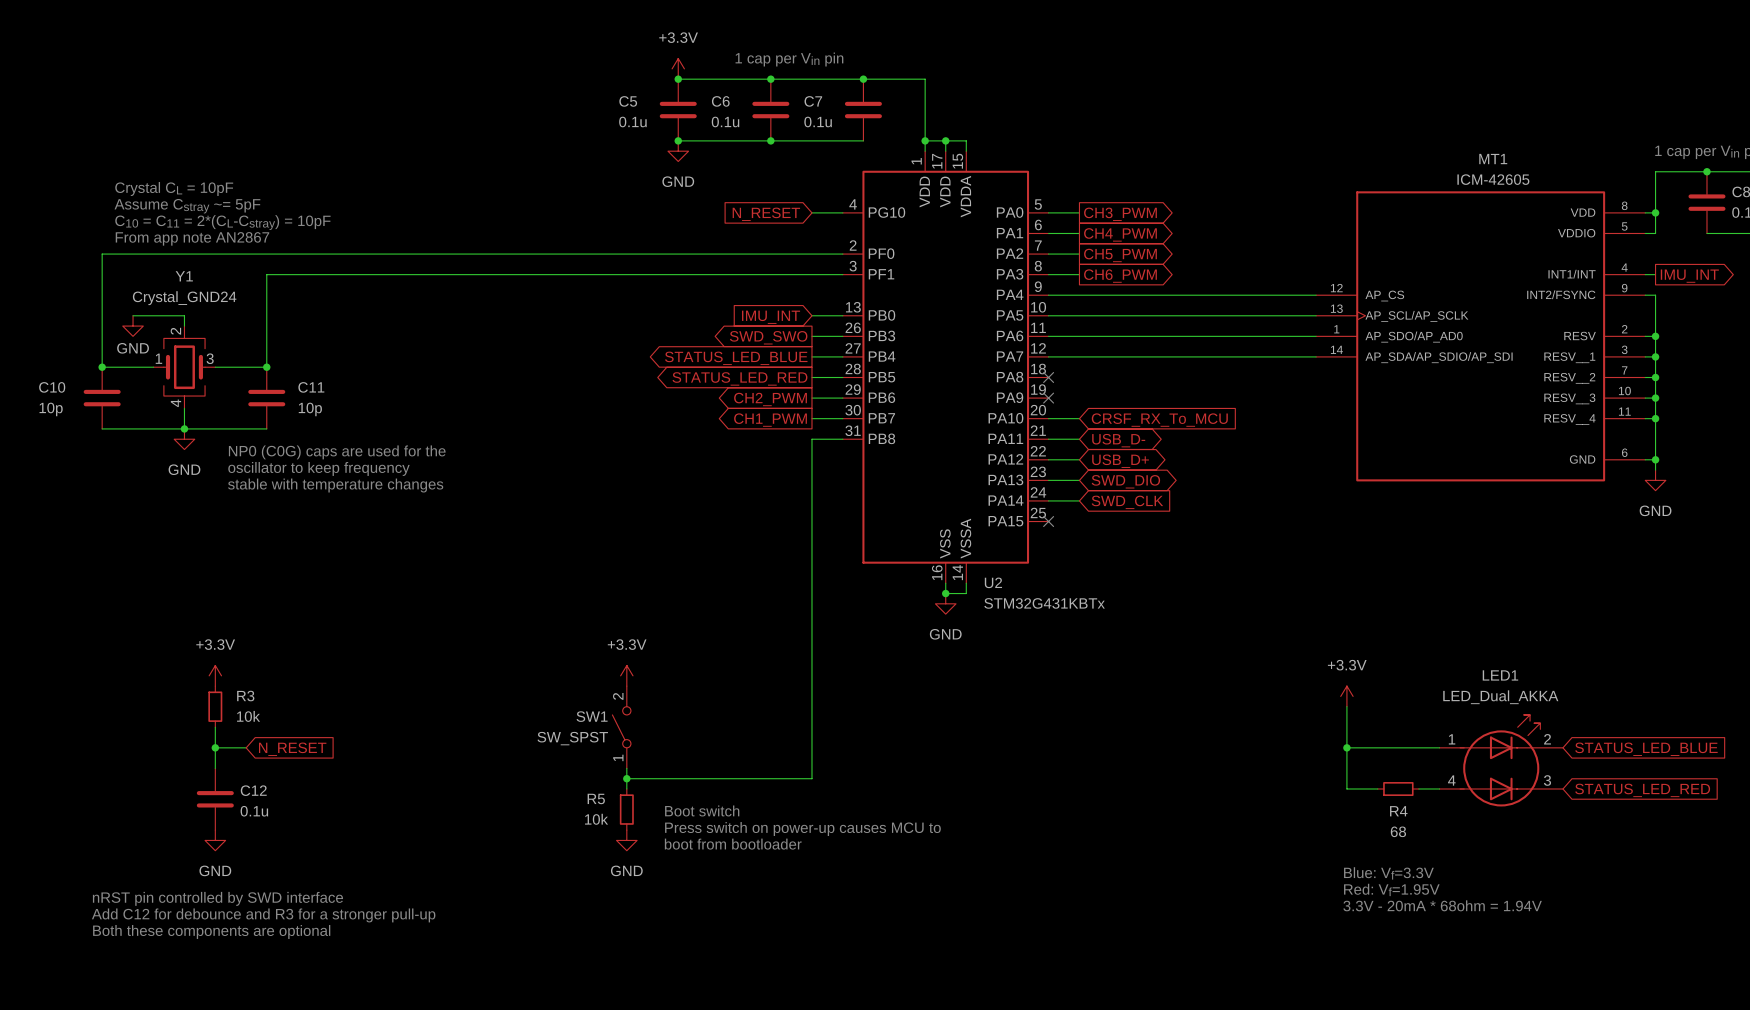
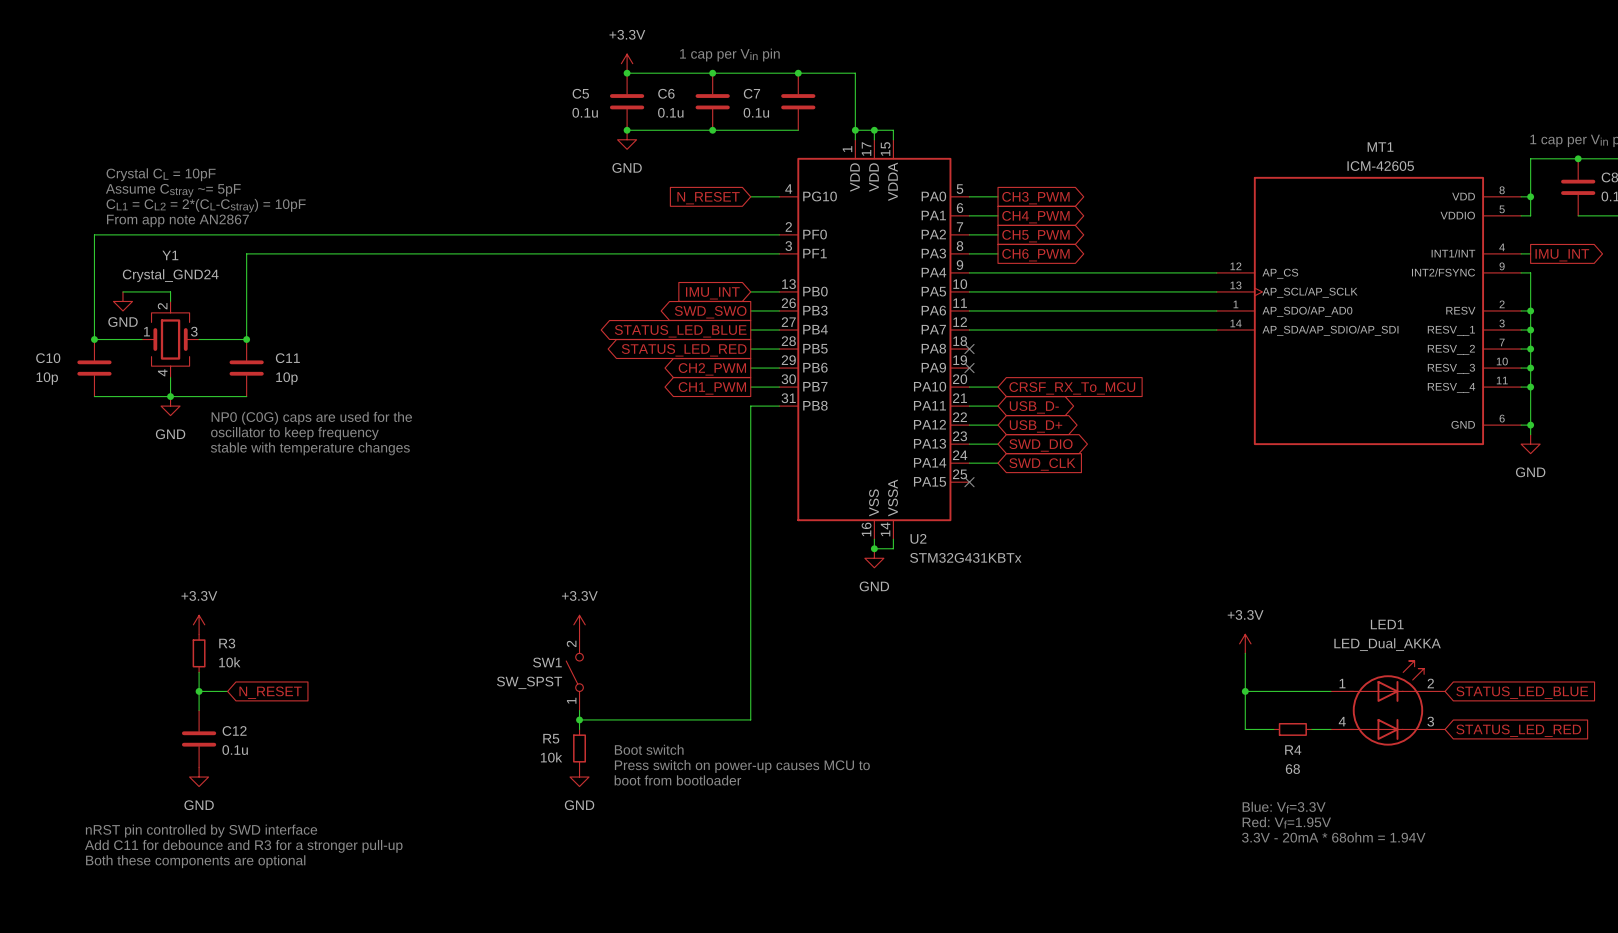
text: C10 = C11 = 2*(CL-Cstray) = 10pF (222, 222) -> CL1 = CL2 = 2*(CL-Cstray) = 10pF (206, 205)
text: Add C12 for debounce and R3 for a stronger pull-up (263, 915) -> Add C11 for debounce and R3 for a stronger pull-up (243, 846)

